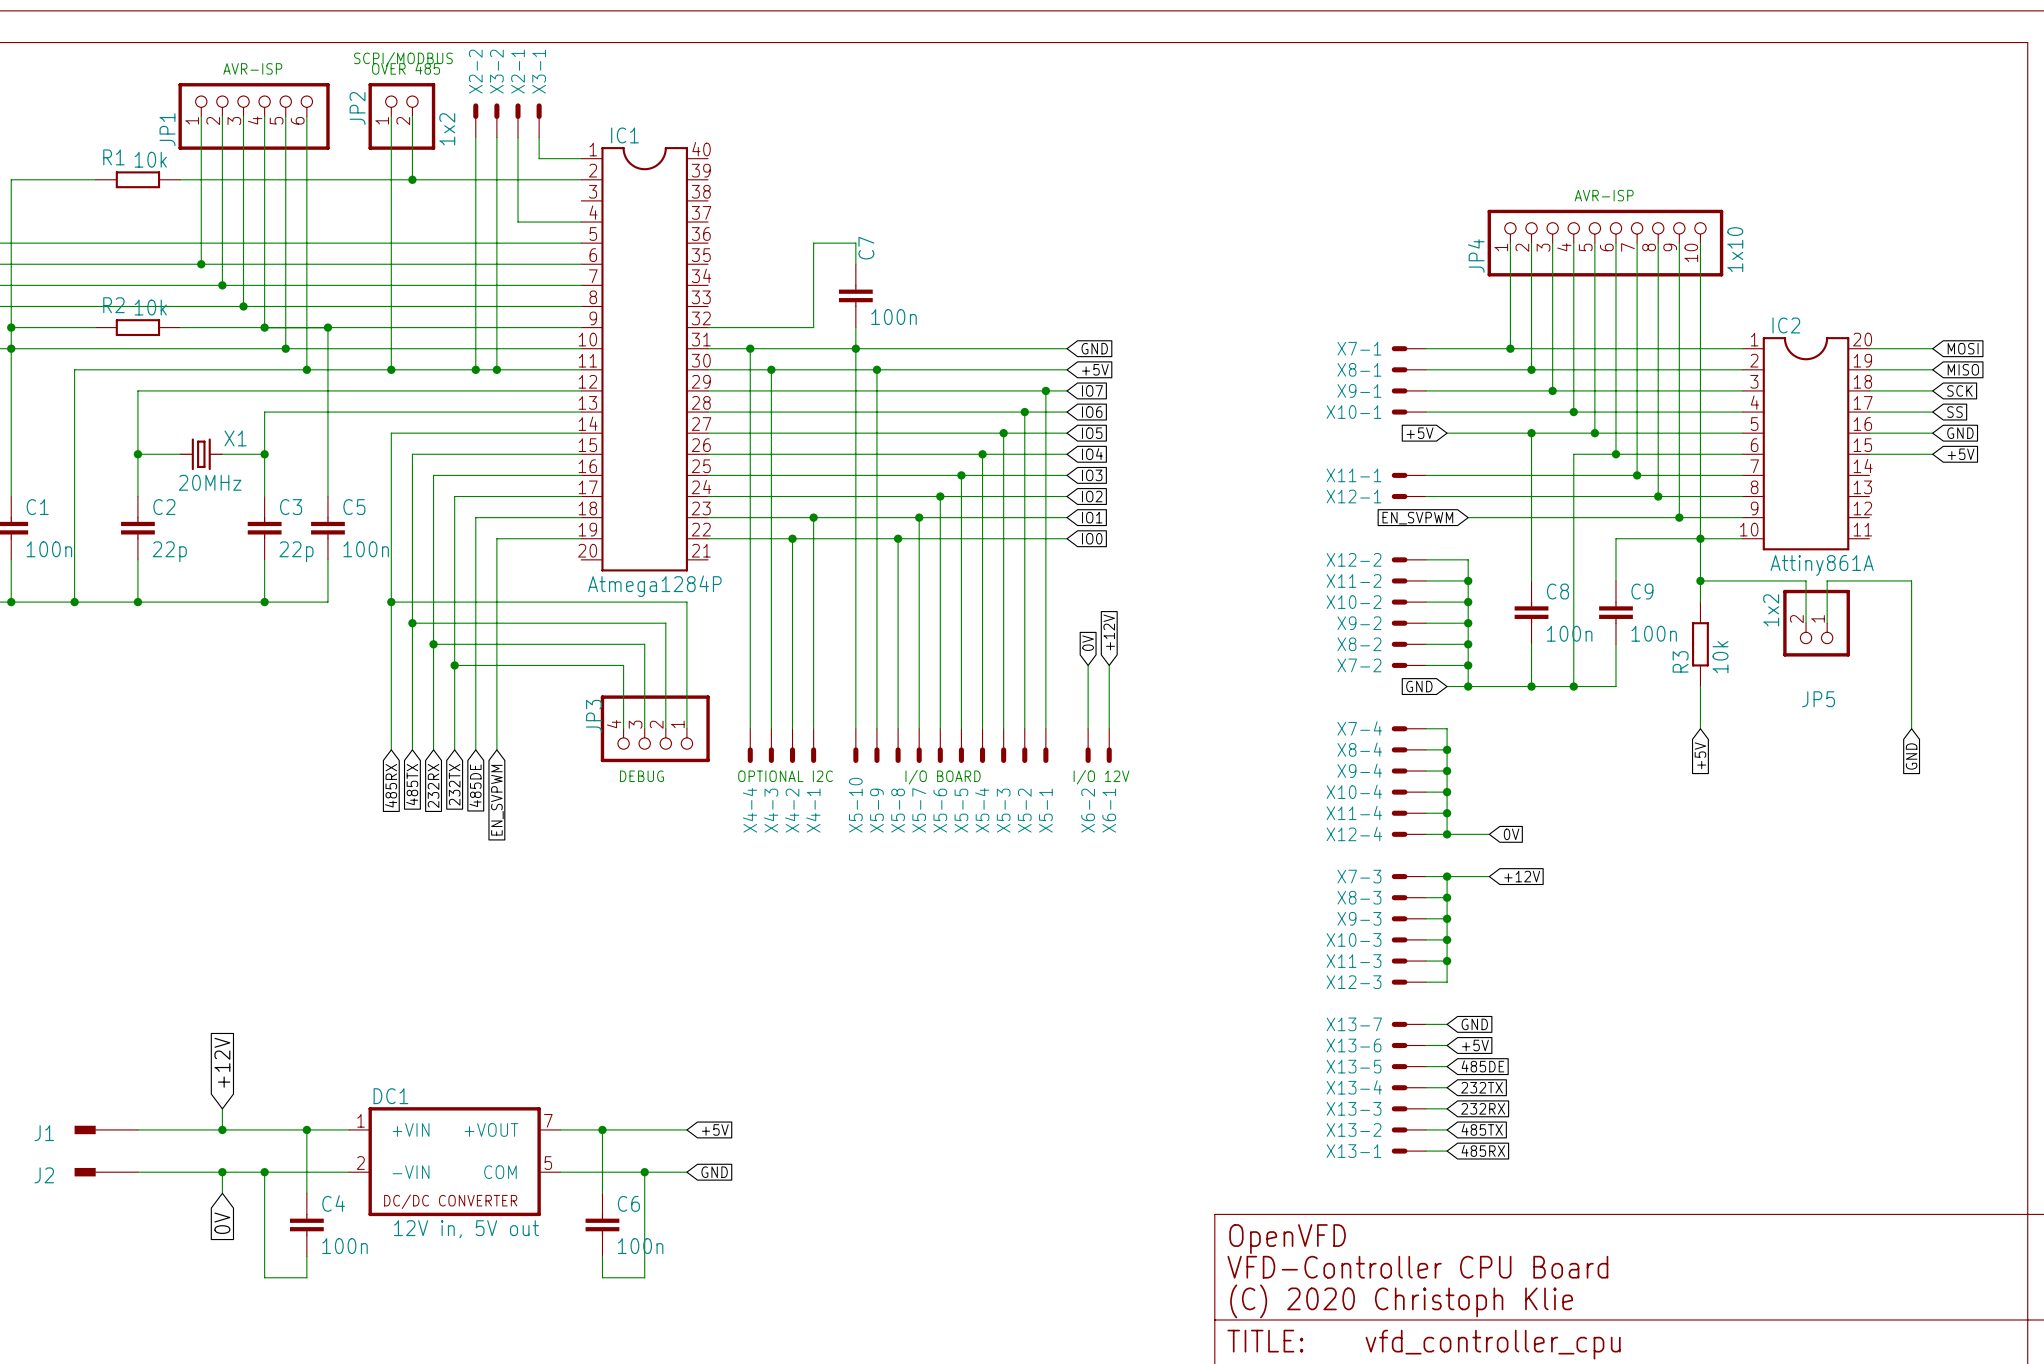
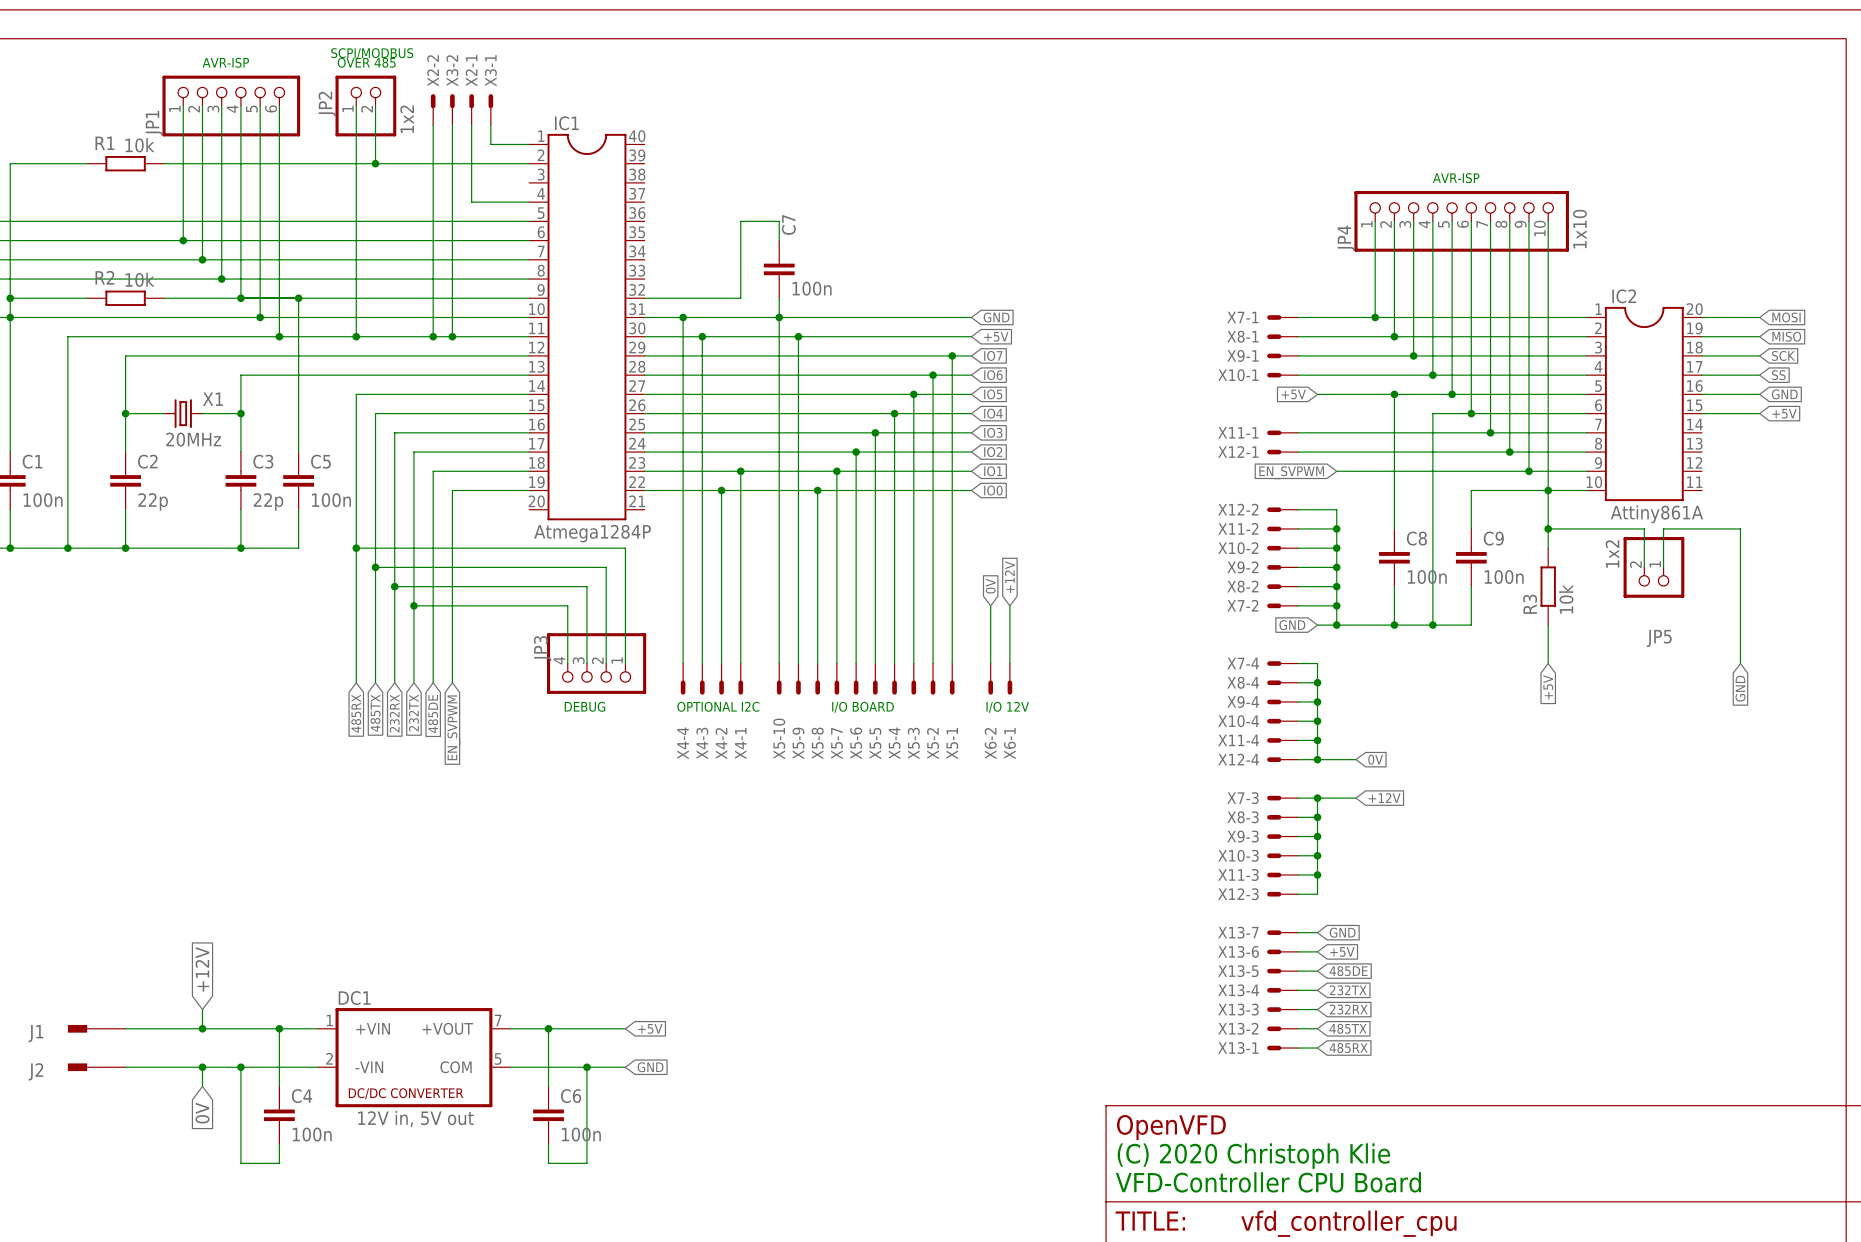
text: VFD-Controller CPU Board (1417, 1267) -> (C) 2020 Christoph Klie (1253, 1156)
text: (C) 2020 Christoph Klie (1401, 1301) -> VFD-Controller CPU Board (1268, 1182)

